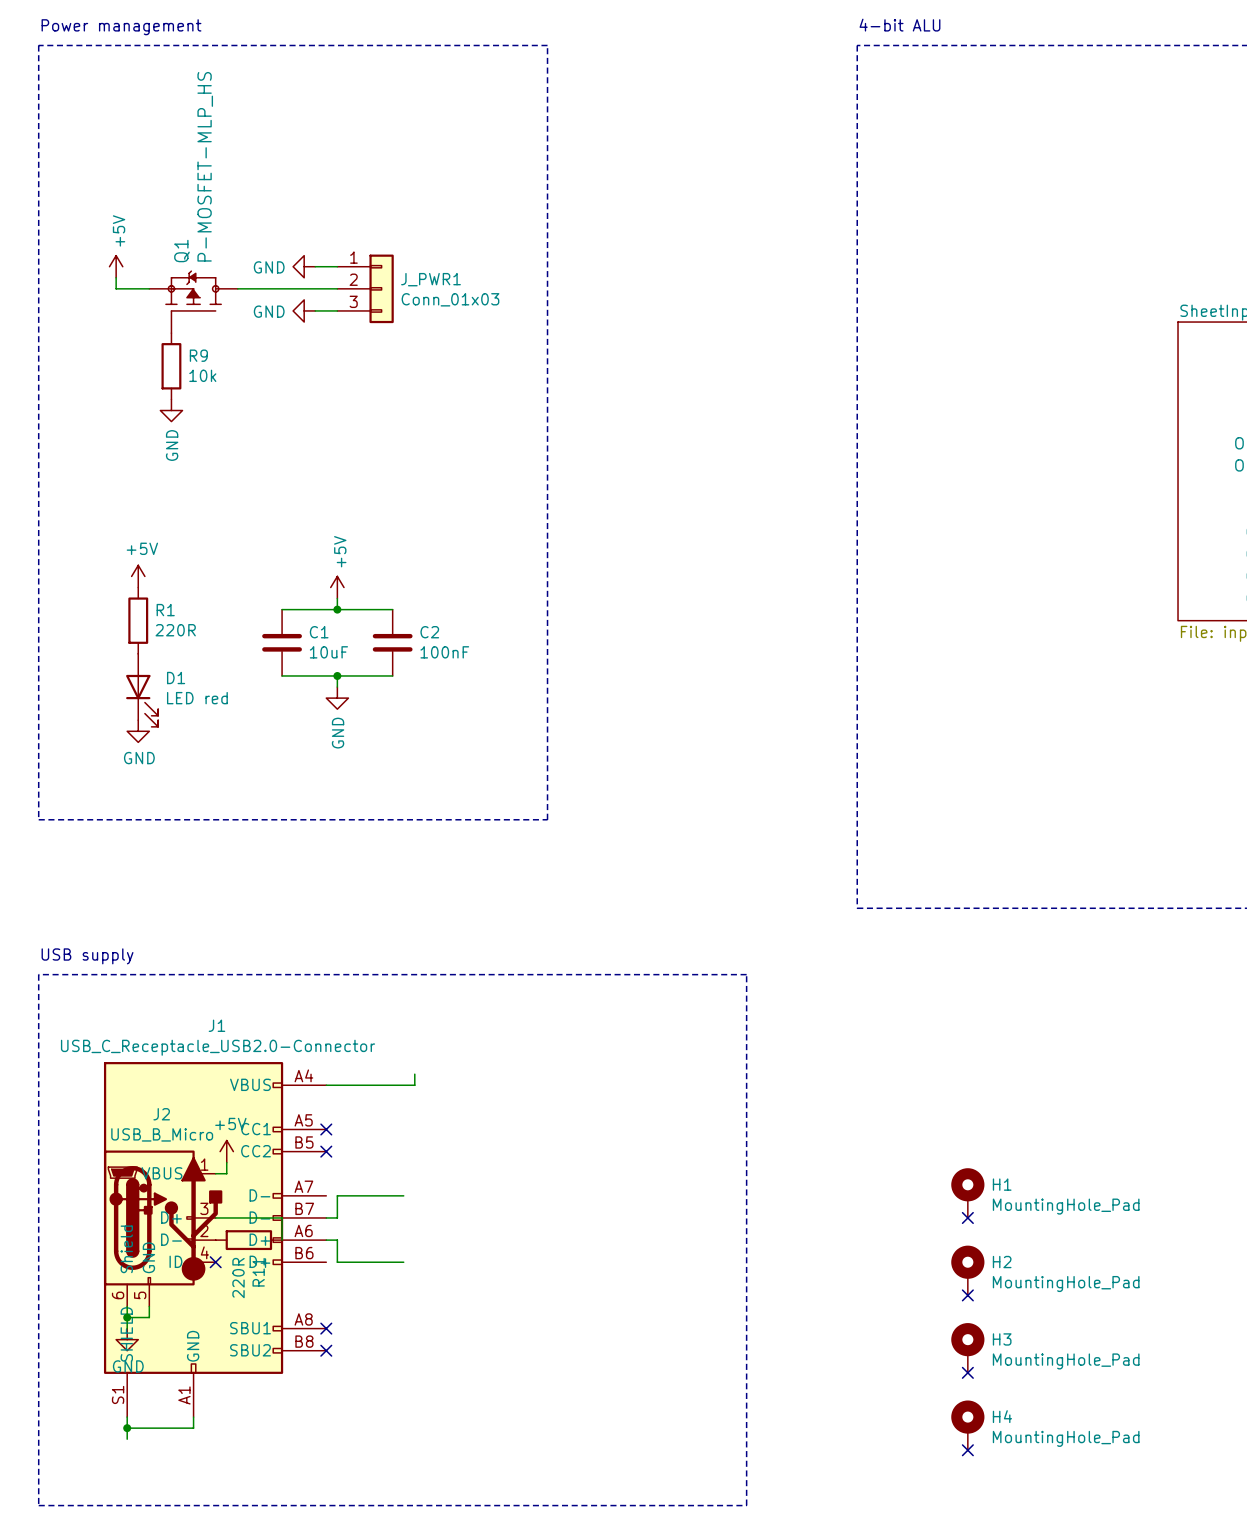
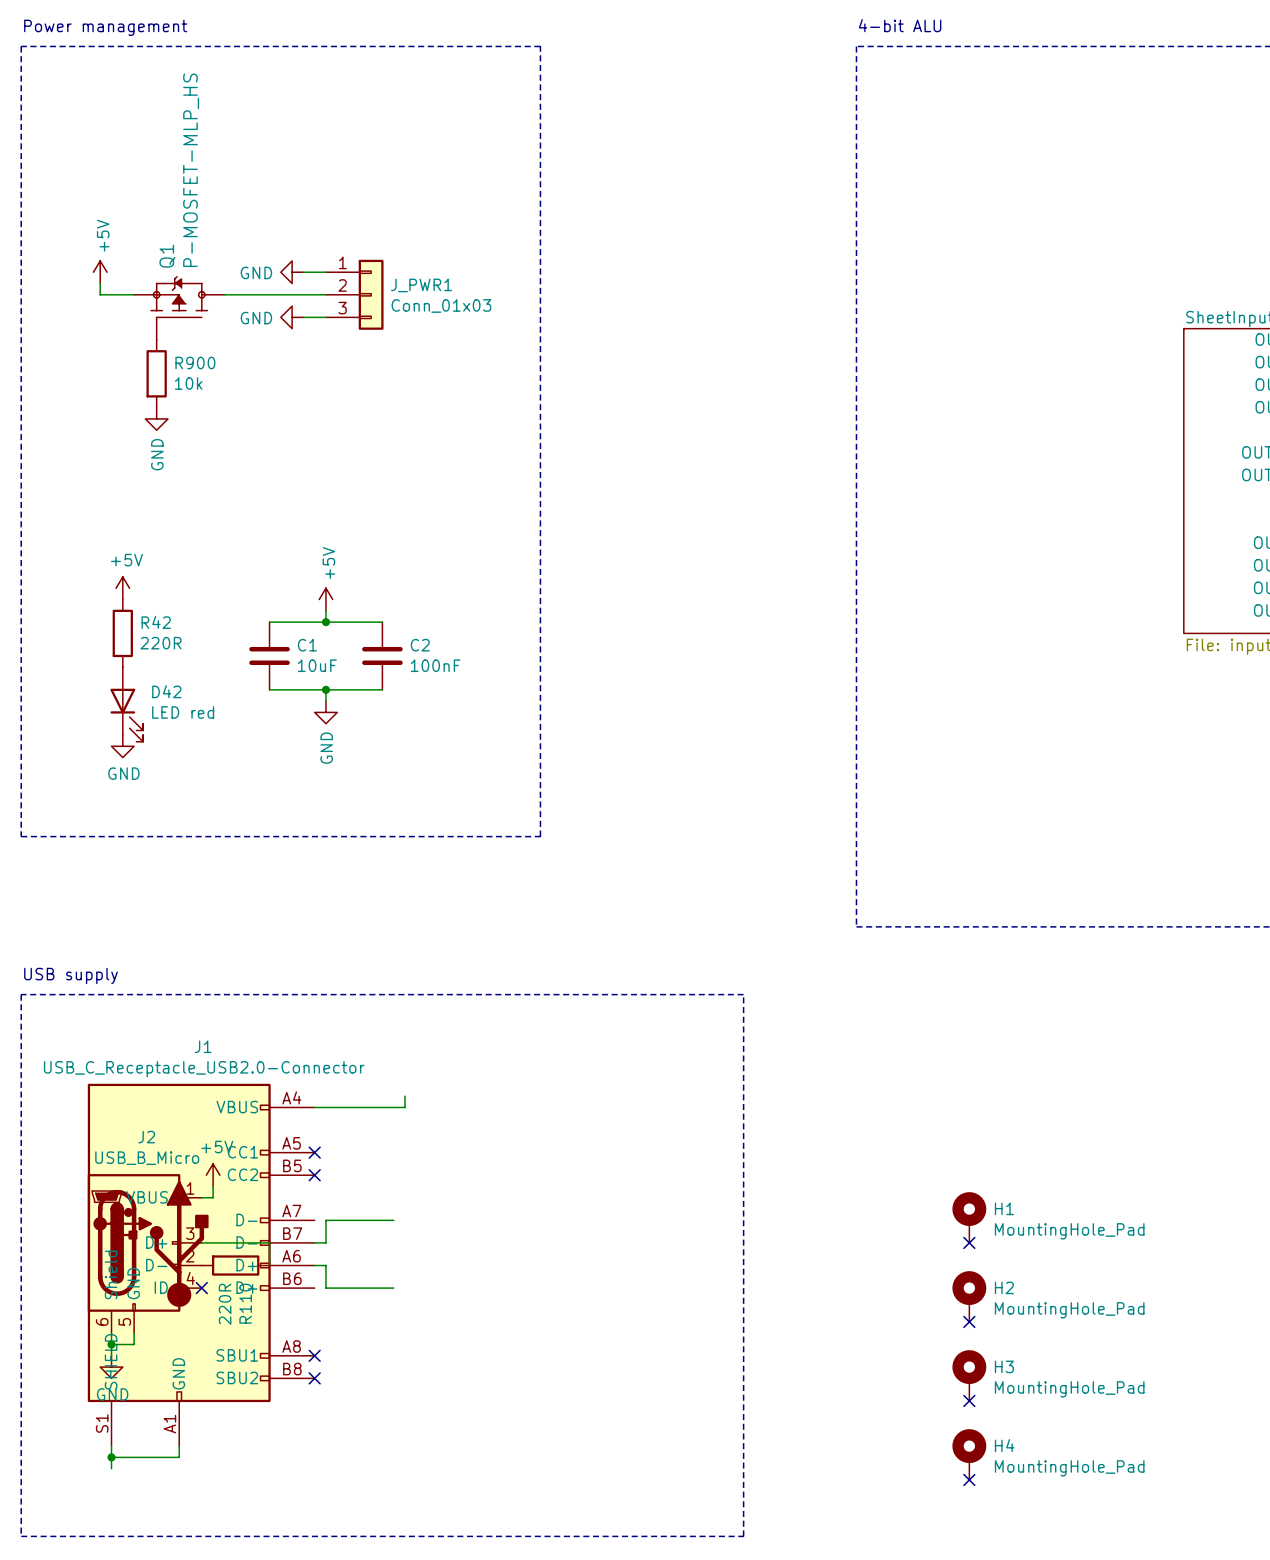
R9 name: R9 (198, 355) -> R900 (195, 363)
R1 name: R1 (165, 610) -> R42 (156, 622)
D1 name: D1 (176, 678) -> D42 (166, 691)
R11 name: R11 (258, 1272) -> R110 (245, 1303)

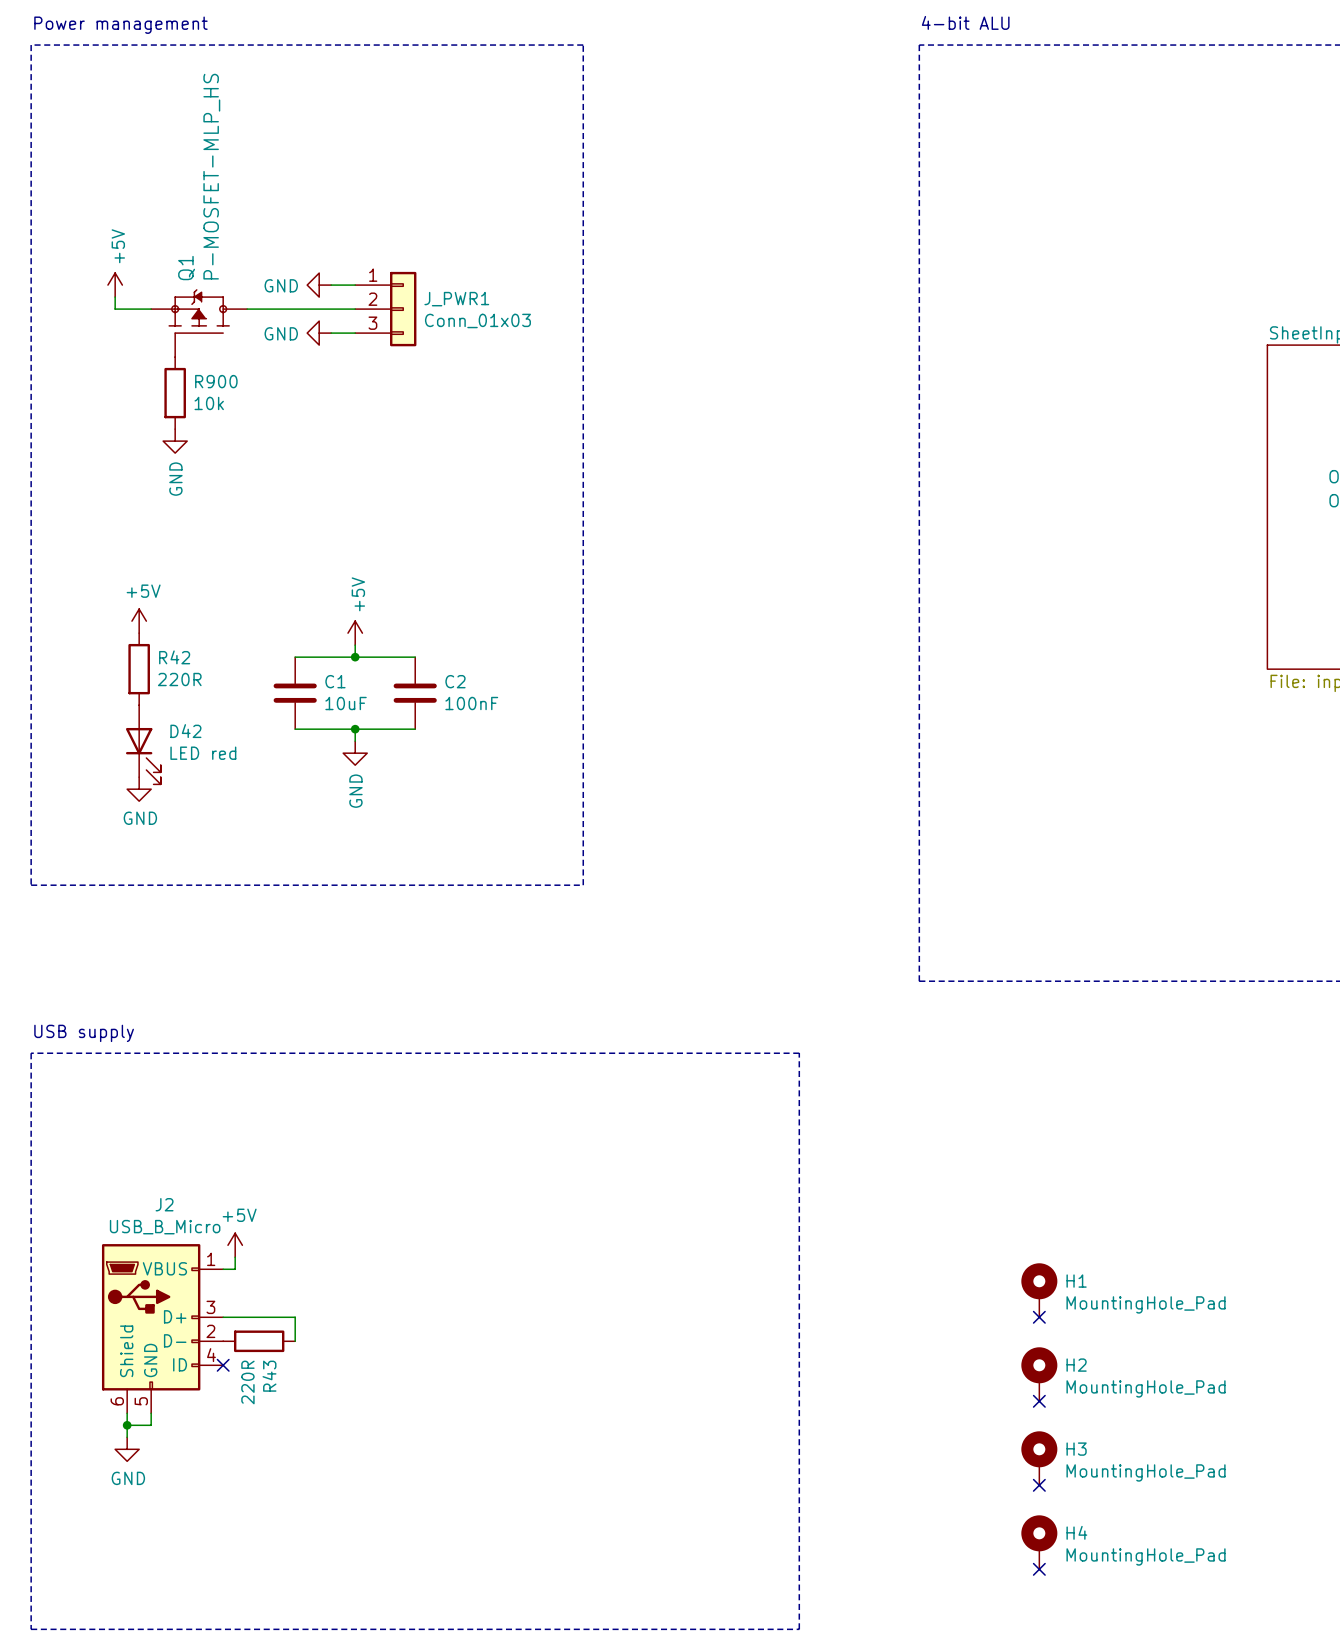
wire: (404, 1096) (404, 1107) (314, 1107) -> none
no-connect mark: (314, 1152) -> none
no-connect mark: (314, 1175) -> none
wire: (393, 1220) (325, 1220) (325, 1242) (314, 1242) -> none
J1: USB_C_Receptacle_USB2.0-Connector (201, 1264) -> none
wire: (314, 1265) (325, 1265) (325, 1288) (393, 1288) -> none
R110 name: R110 (245, 1303) -> R43 (269, 1376)
no-connect mark: (314, 1355) -> none
no-connect mark: (314, 1378) -> none
wire: (111, 1446) (111, 1468) -> none
wire: (179, 1446) (179, 1457) (111, 1457) -> none
junction: (111, 1457) -> none

